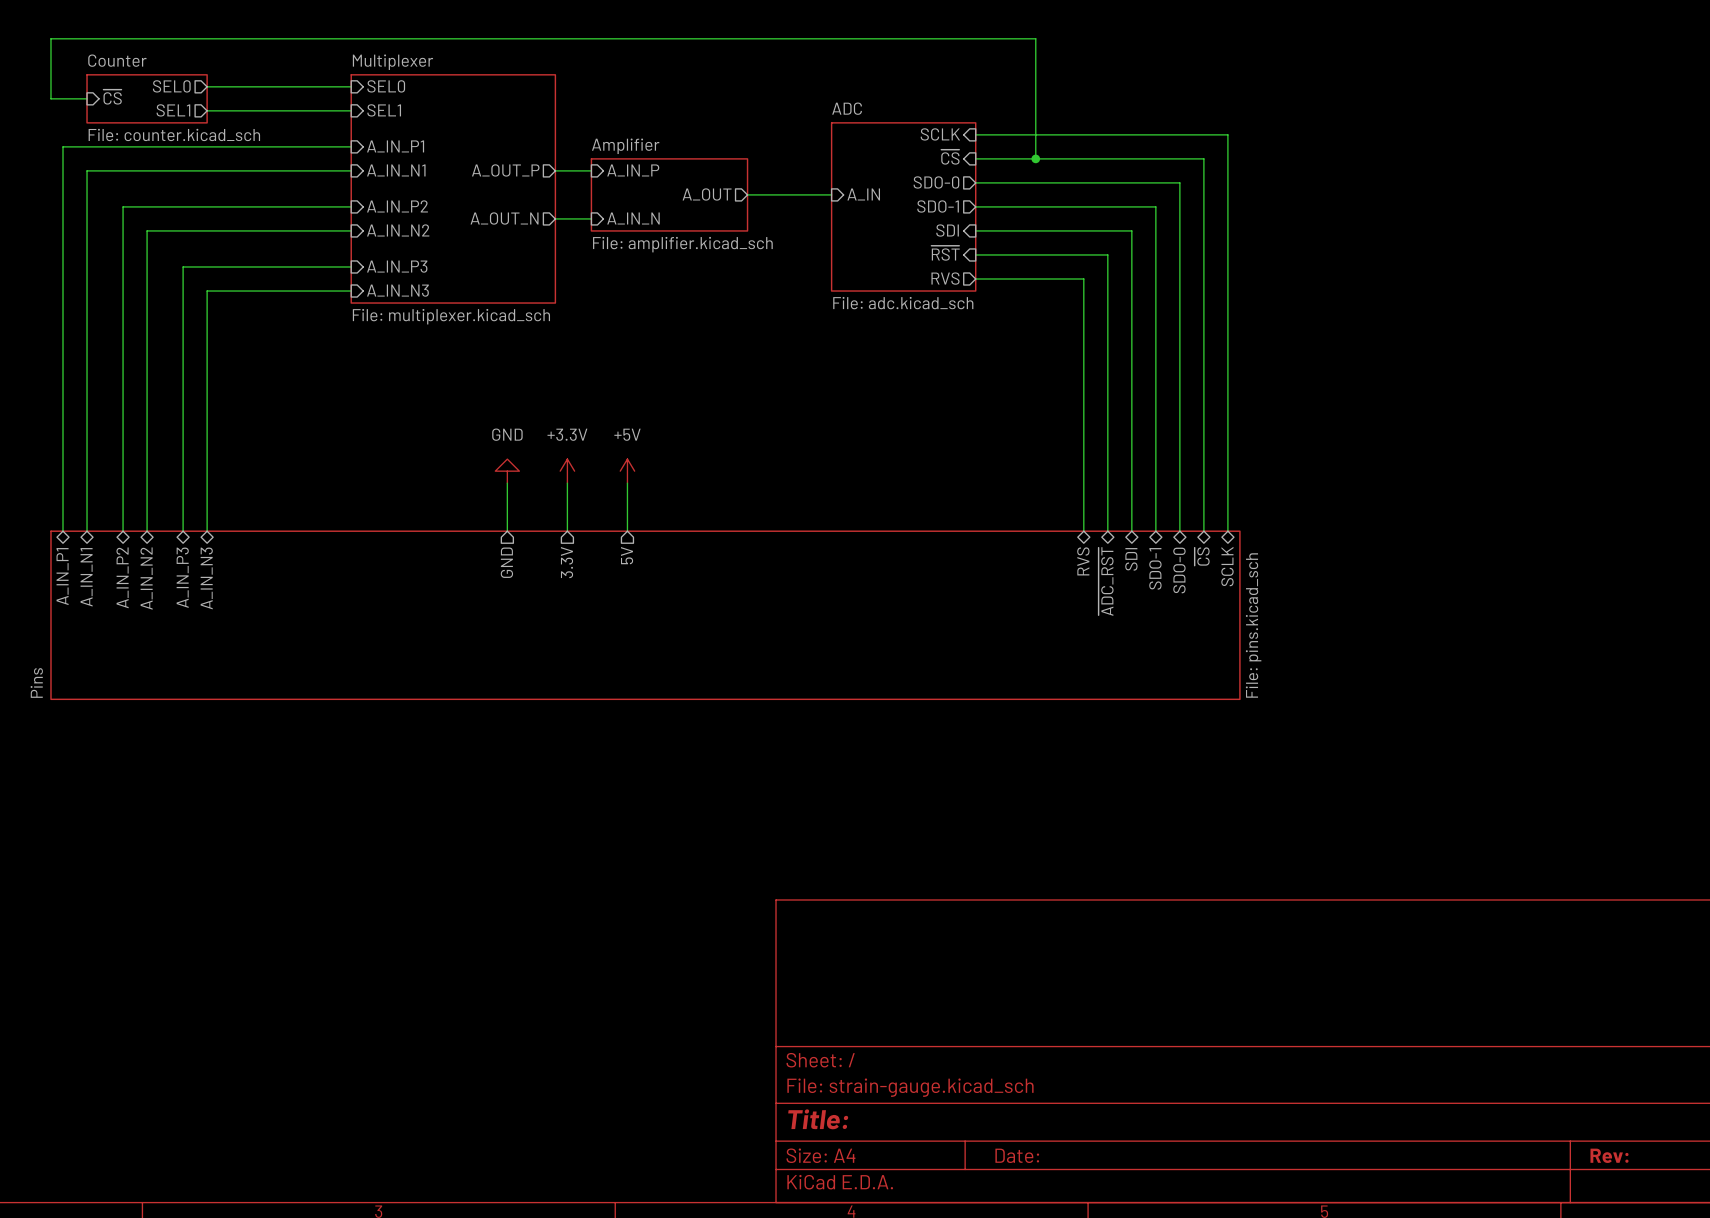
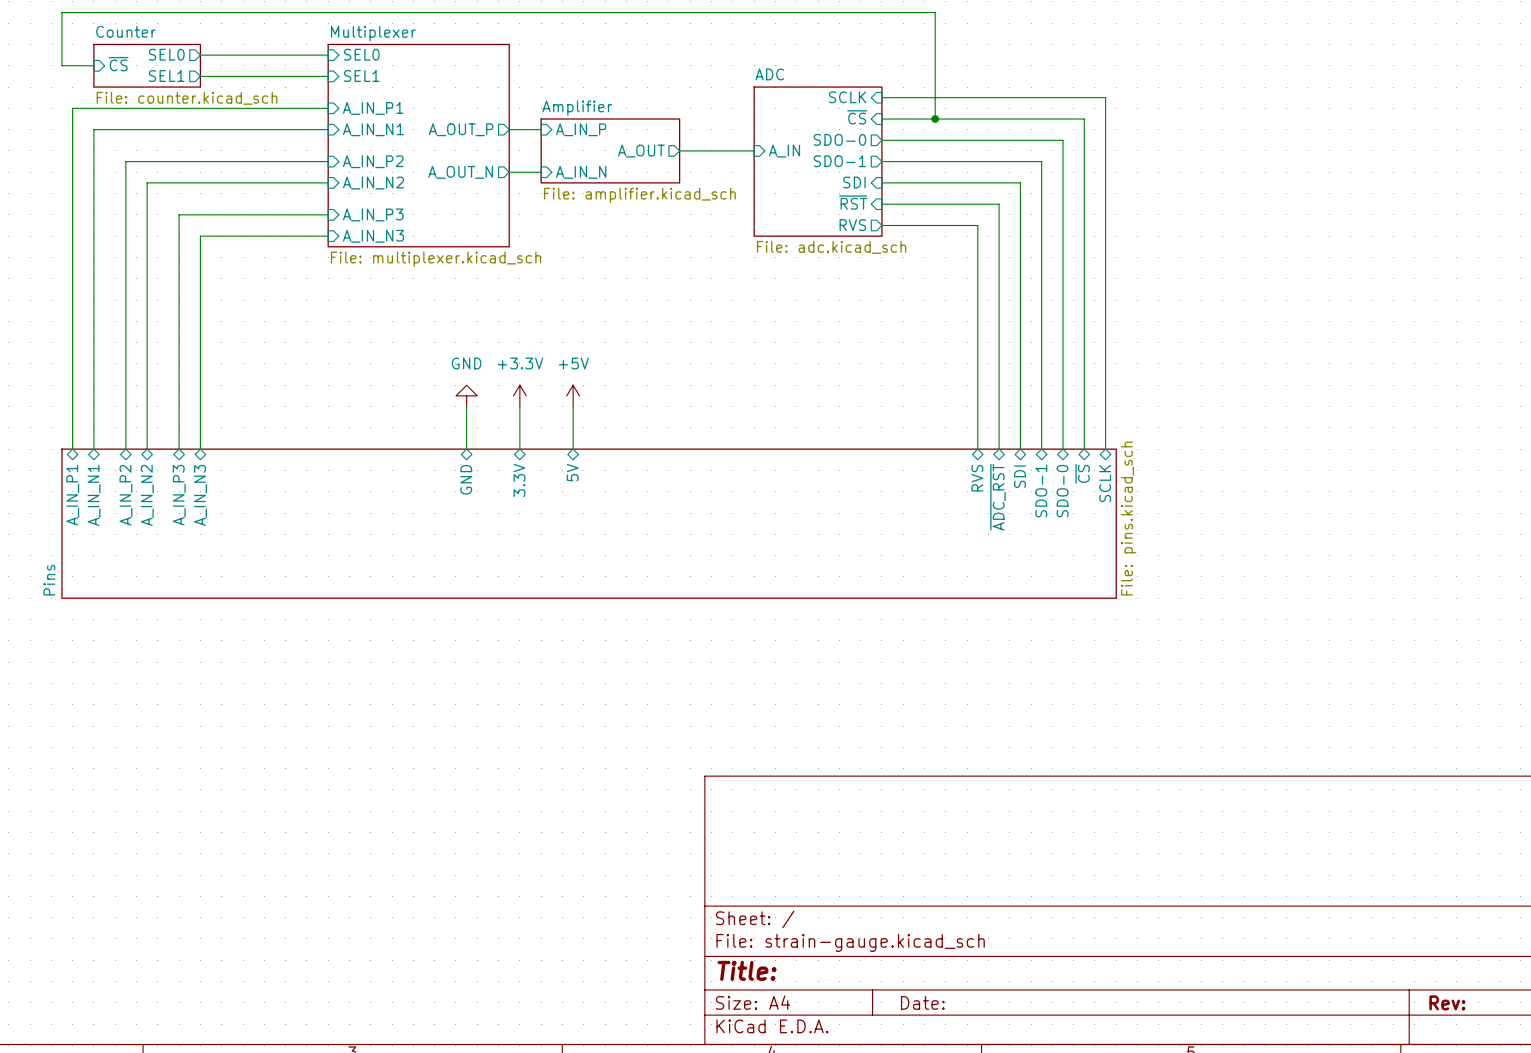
sheet pin shape: output (627, 555) -> bidirectional (572, 472)
sheet pin shape: output (506, 562) -> bidirectional (466, 479)
sheet pin shape: output (567, 562) -> bidirectional (519, 480)

